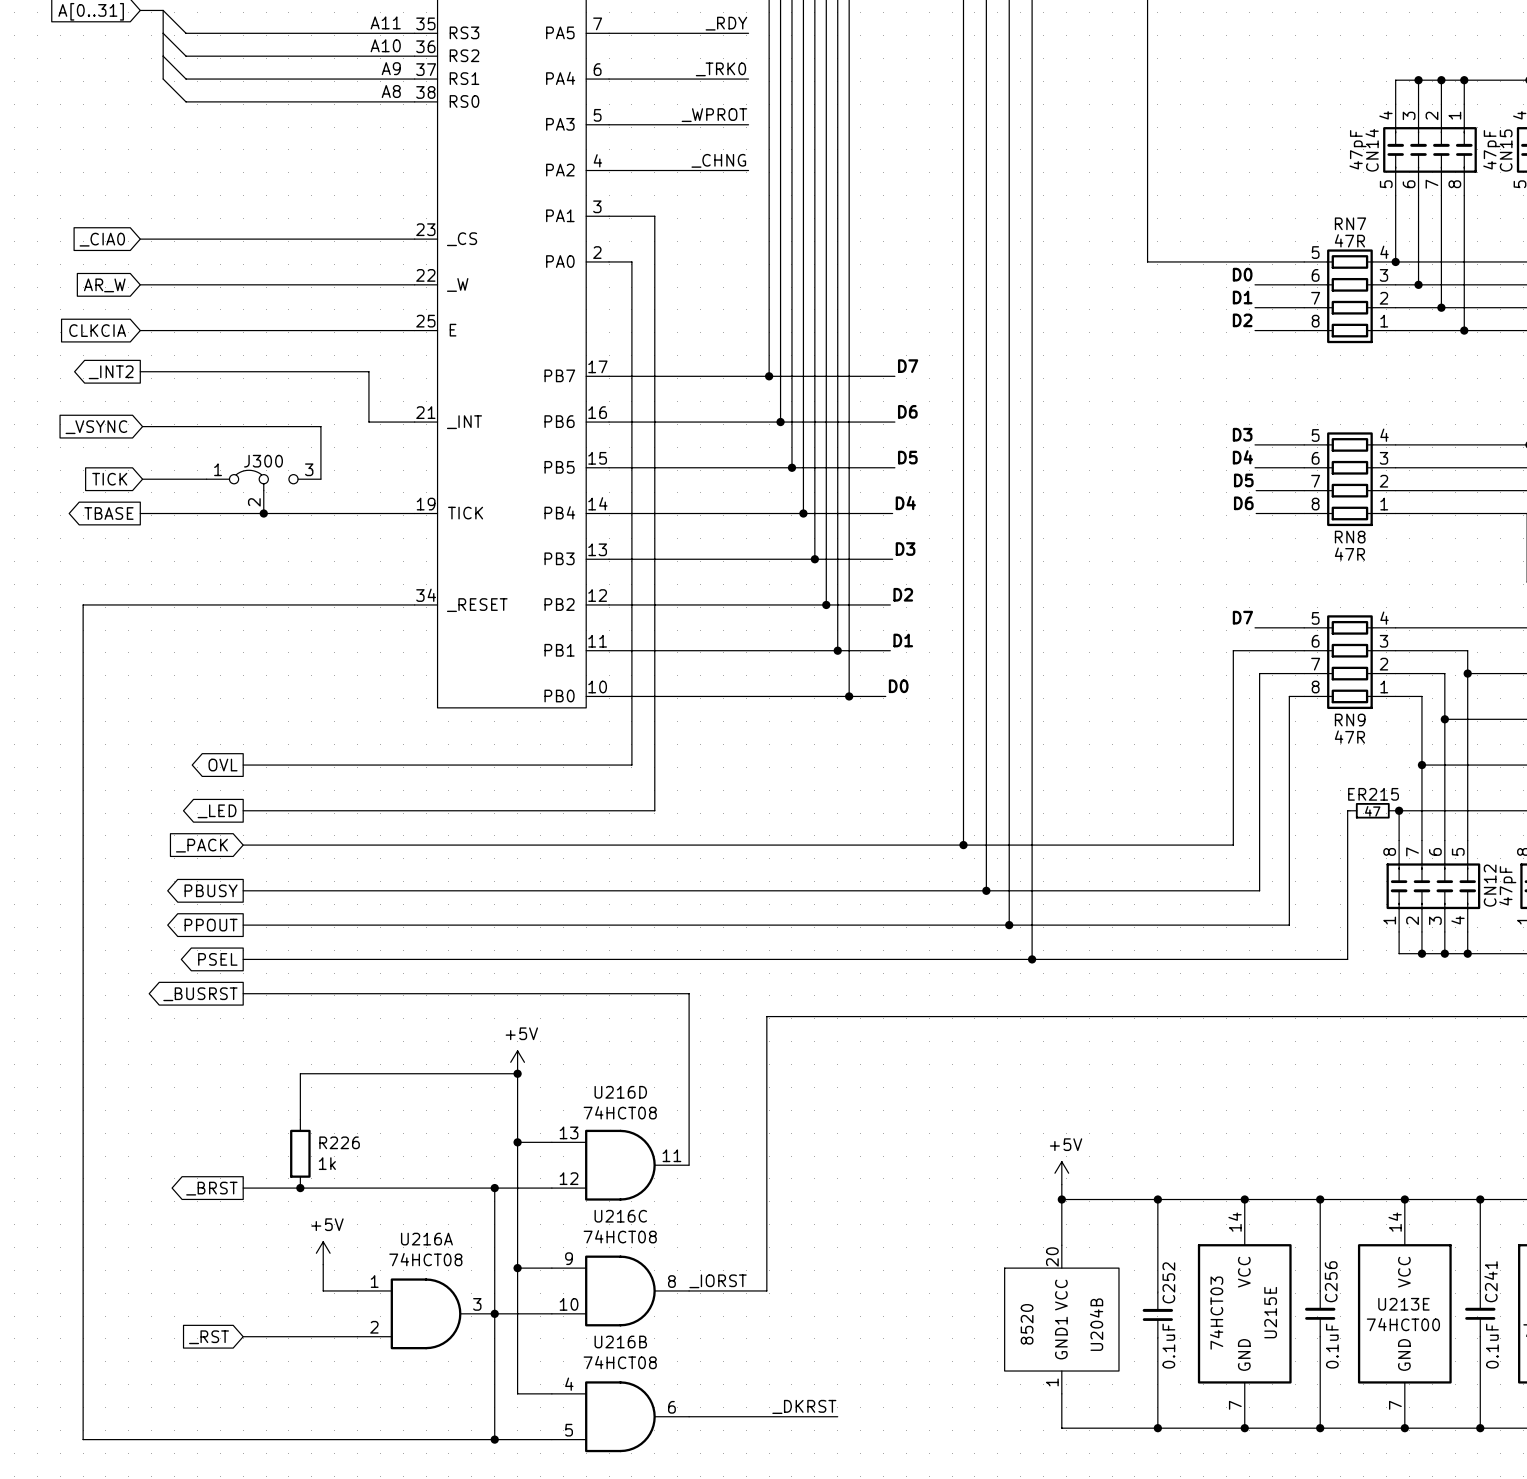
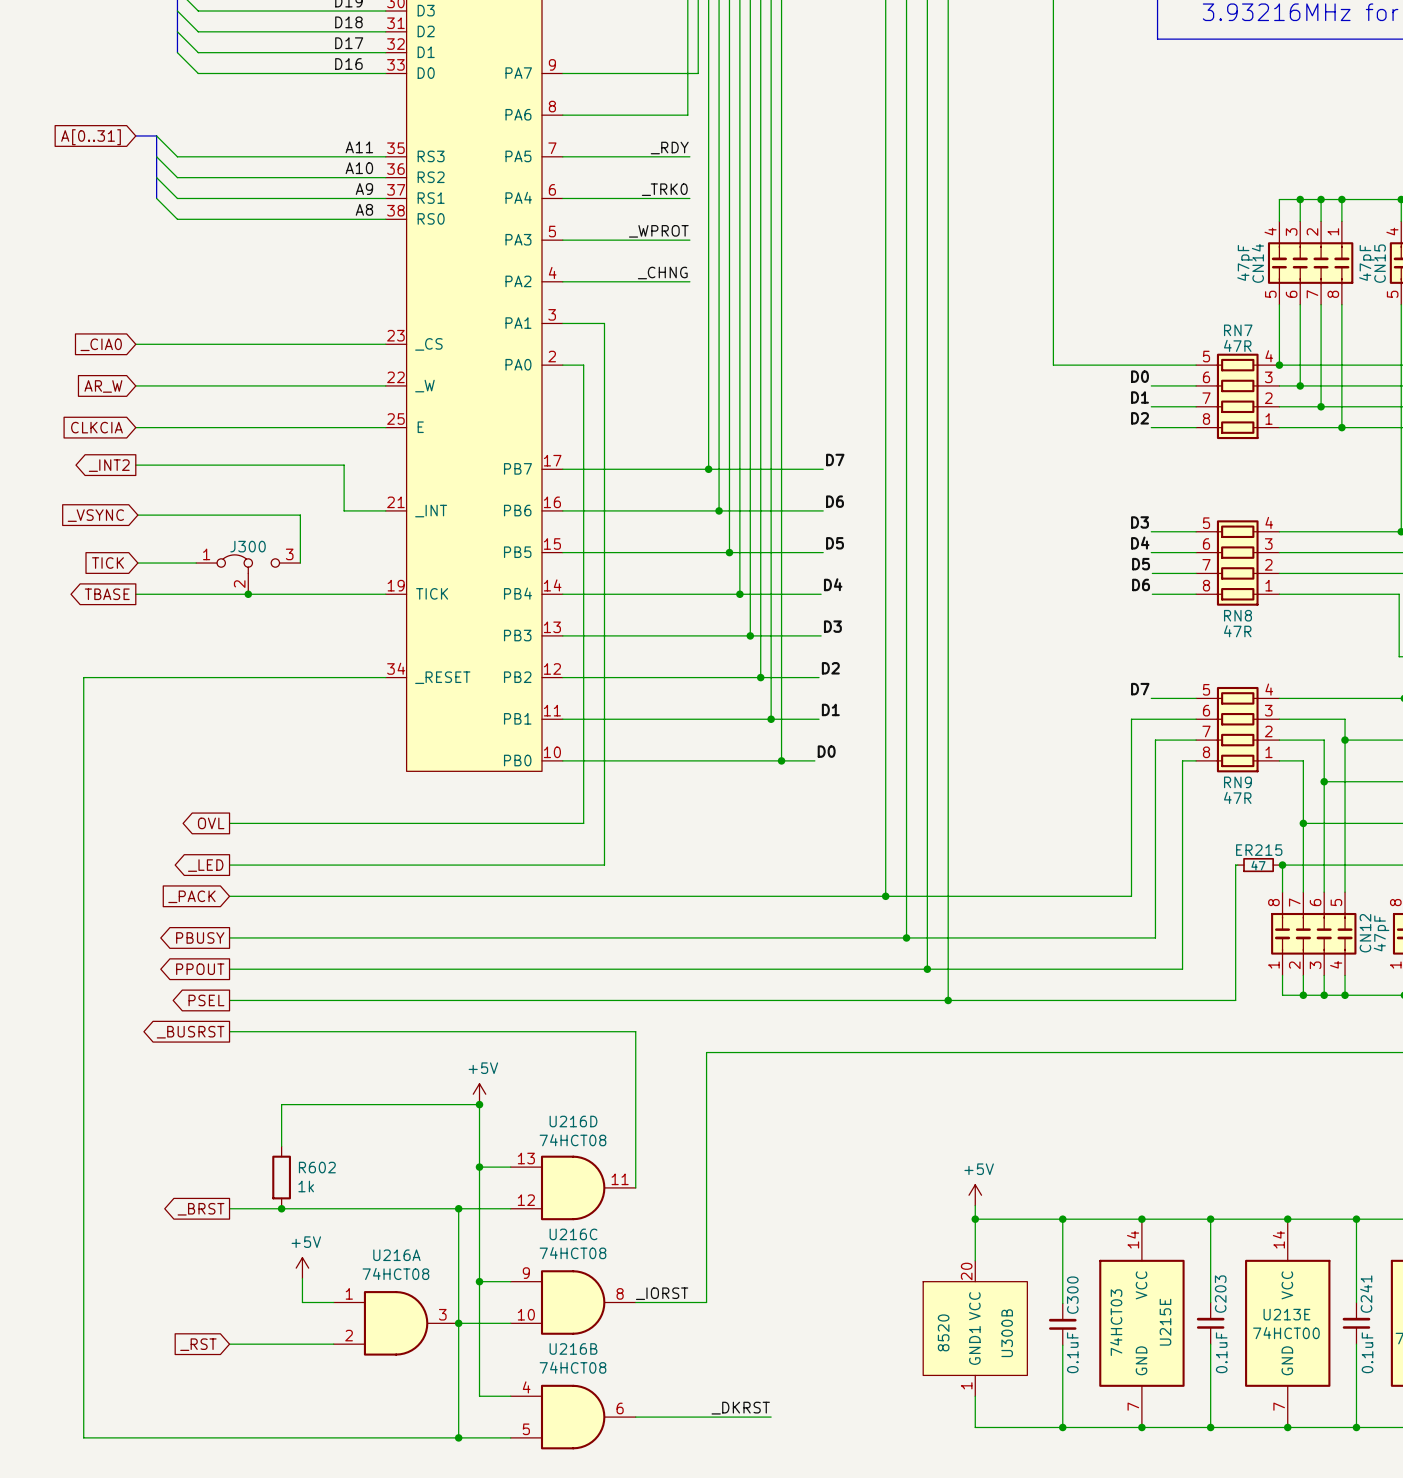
R226 name: R226 (339, 1142) -> R602 (317, 1167)
C256 name: C256 (1331, 1281) -> C203 (1220, 1294)
C252 name: C252 (1168, 1282) -> C300 (1072, 1295)
U204B name: U204B (1096, 1324) -> U300B (1007, 1333)

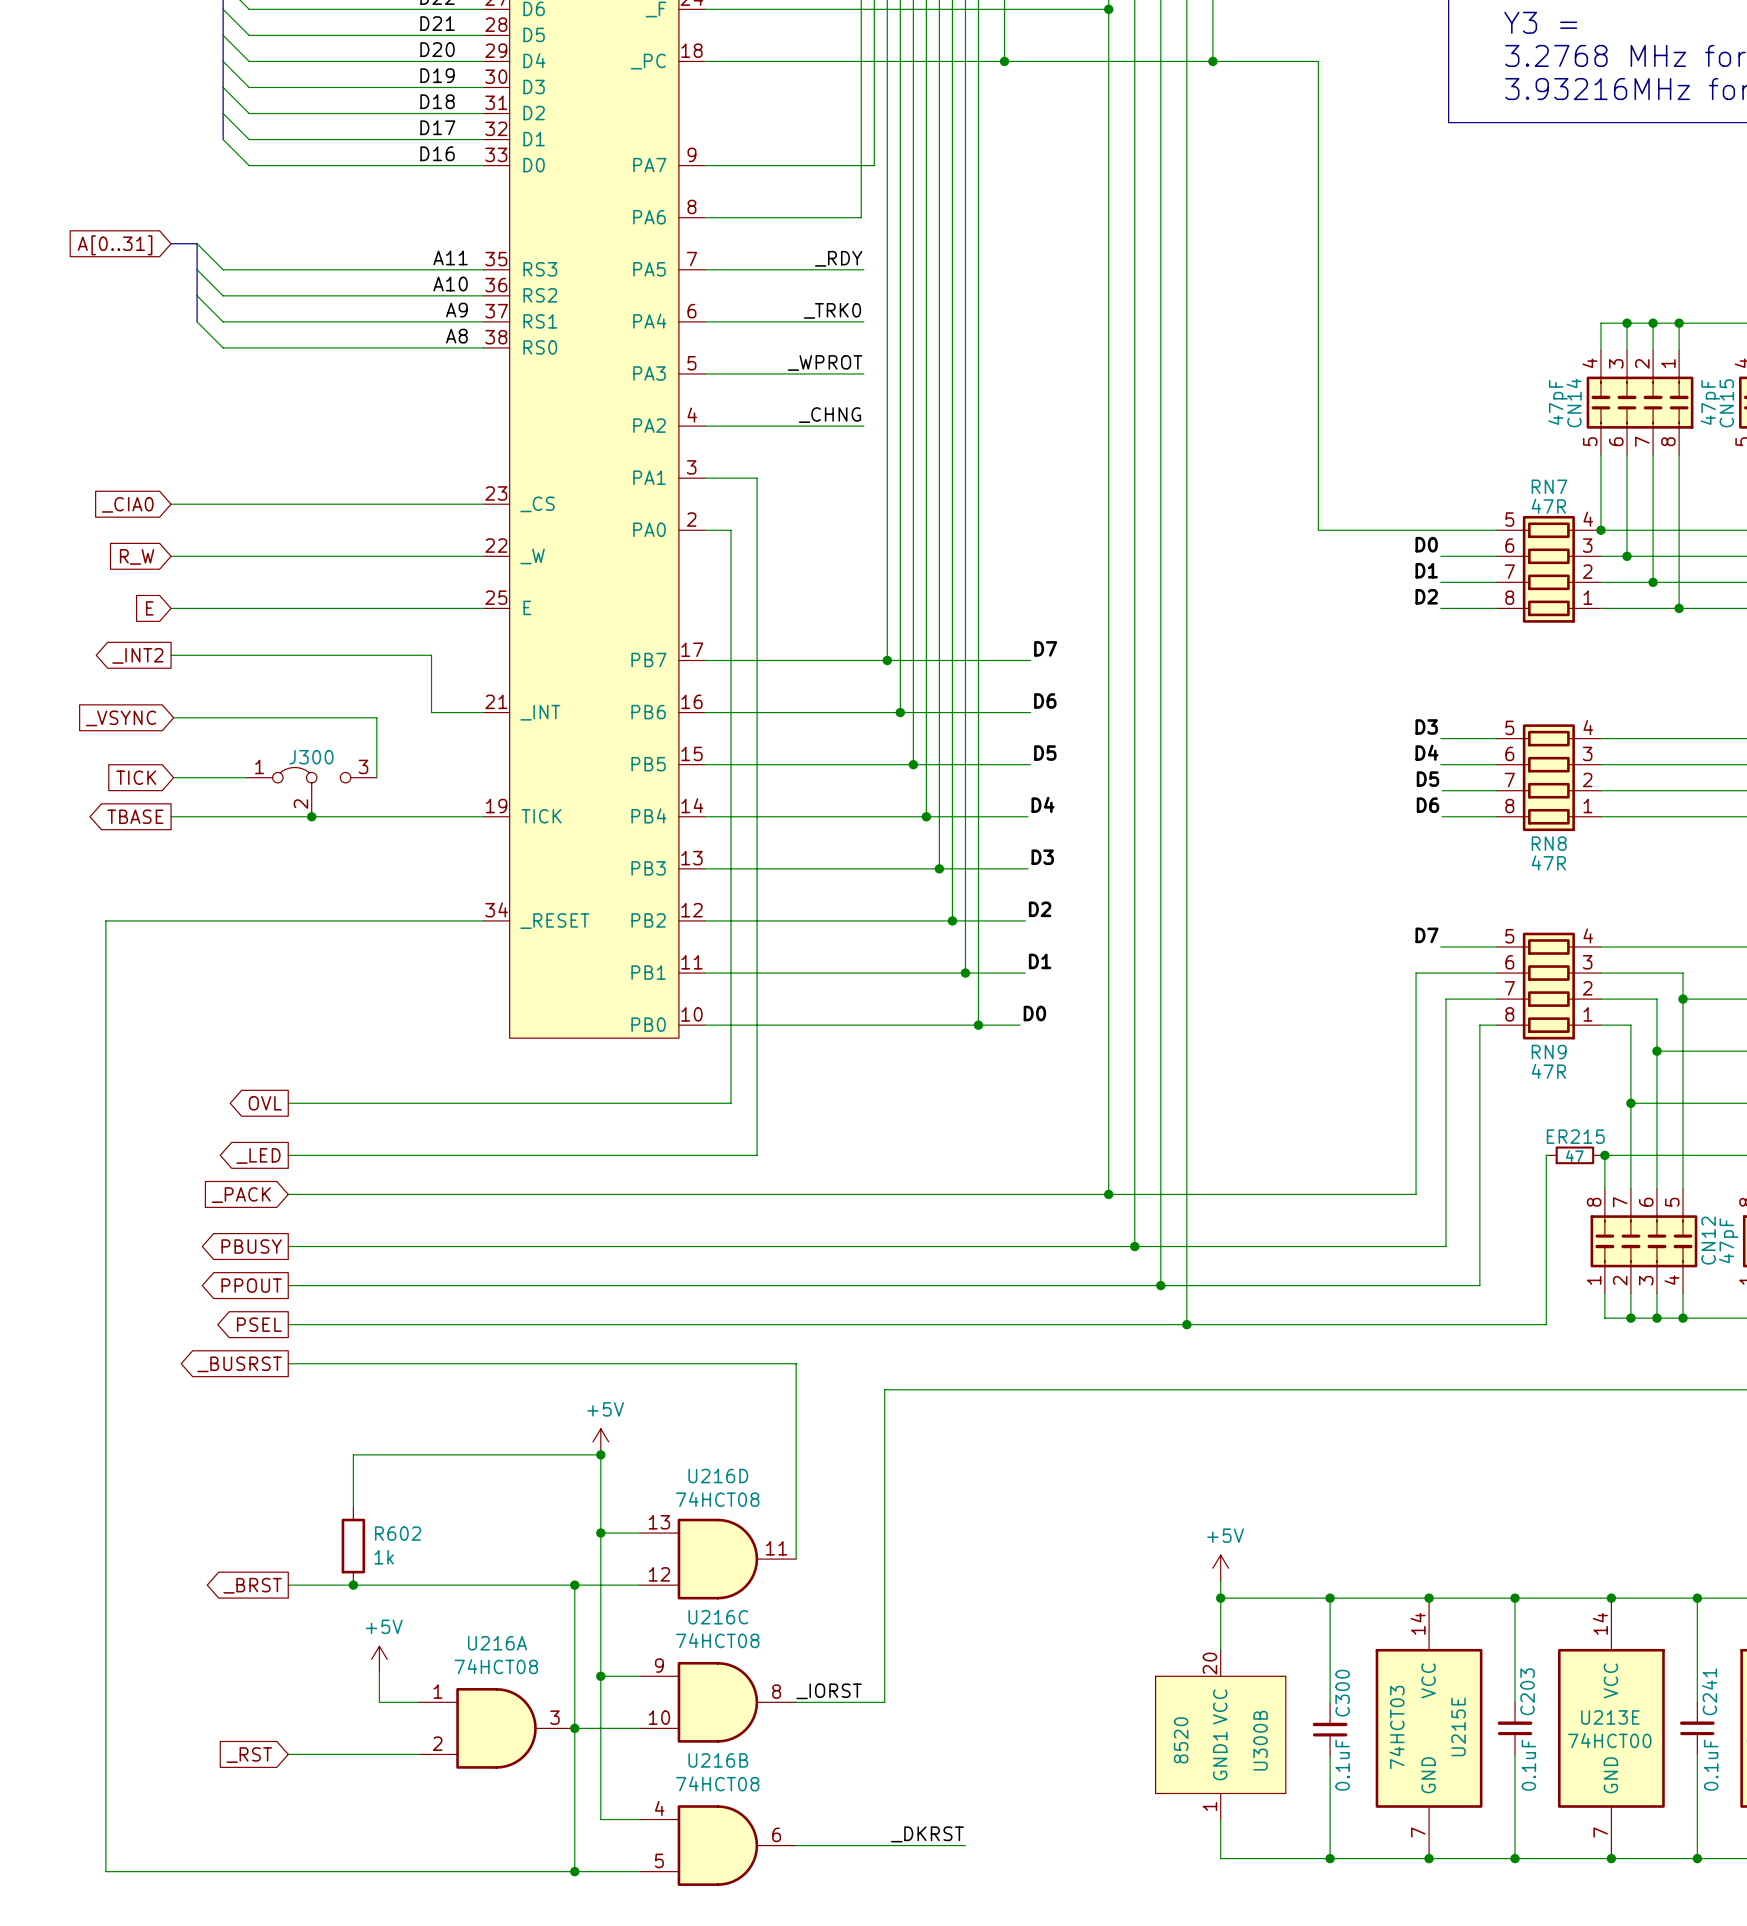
global label: AR_W (103, 386) -> R_W (137, 556)
global label: CLKCIA (96, 427) -> E (149, 608)

